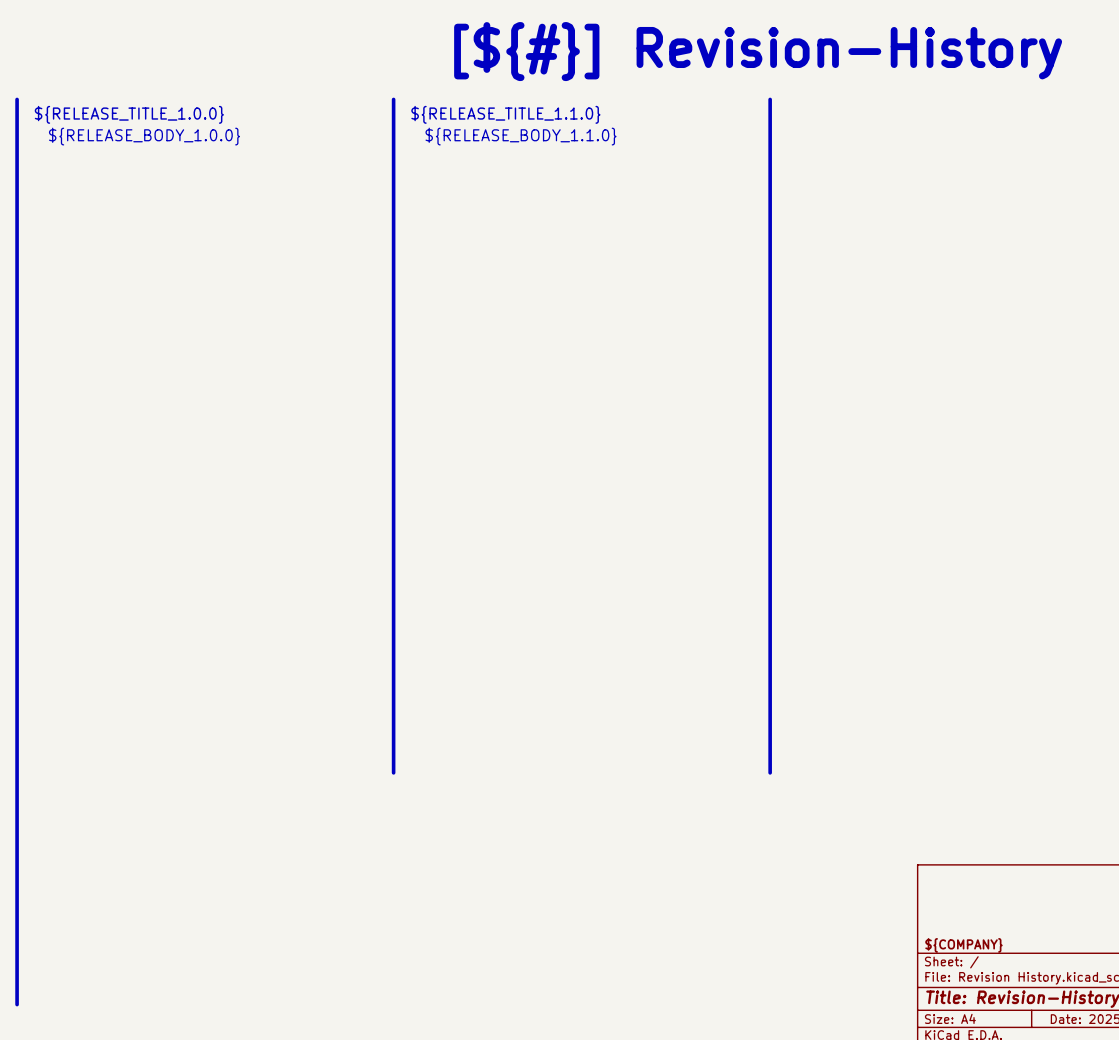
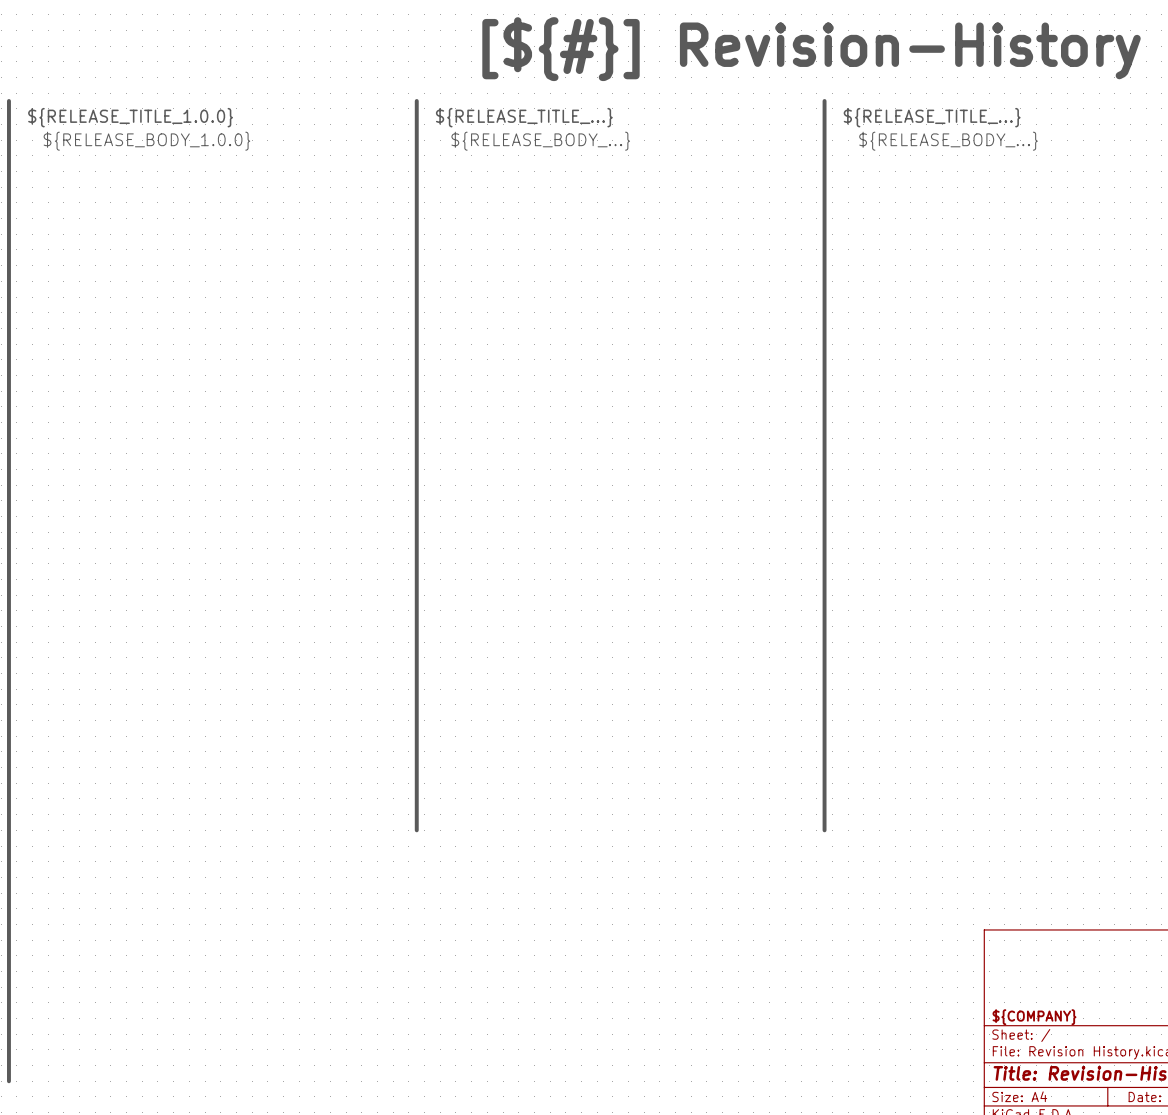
text: ${RELEASE_TITLE_1.1.0} (505, 114) -> ${RELEASE_TITLE_...} (524, 117)
text: none -> ${RELEASE_TITLE_...} (932, 117)
text: ${RELEASE_BODY_1.1.0} (521, 136) -> ${RELEASE_BODY_...} (540, 141)
text: none -> ${RELEASE_BODY_...} (948, 141)

